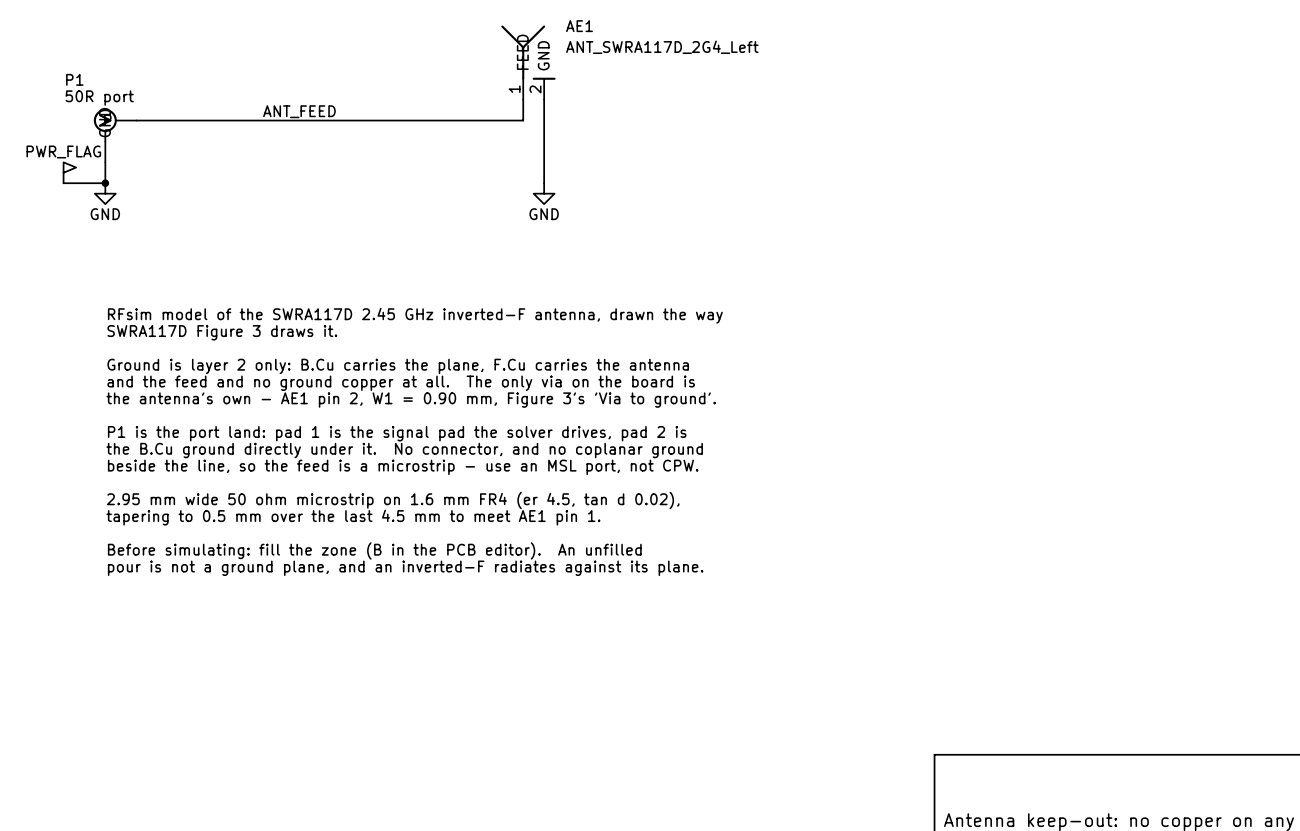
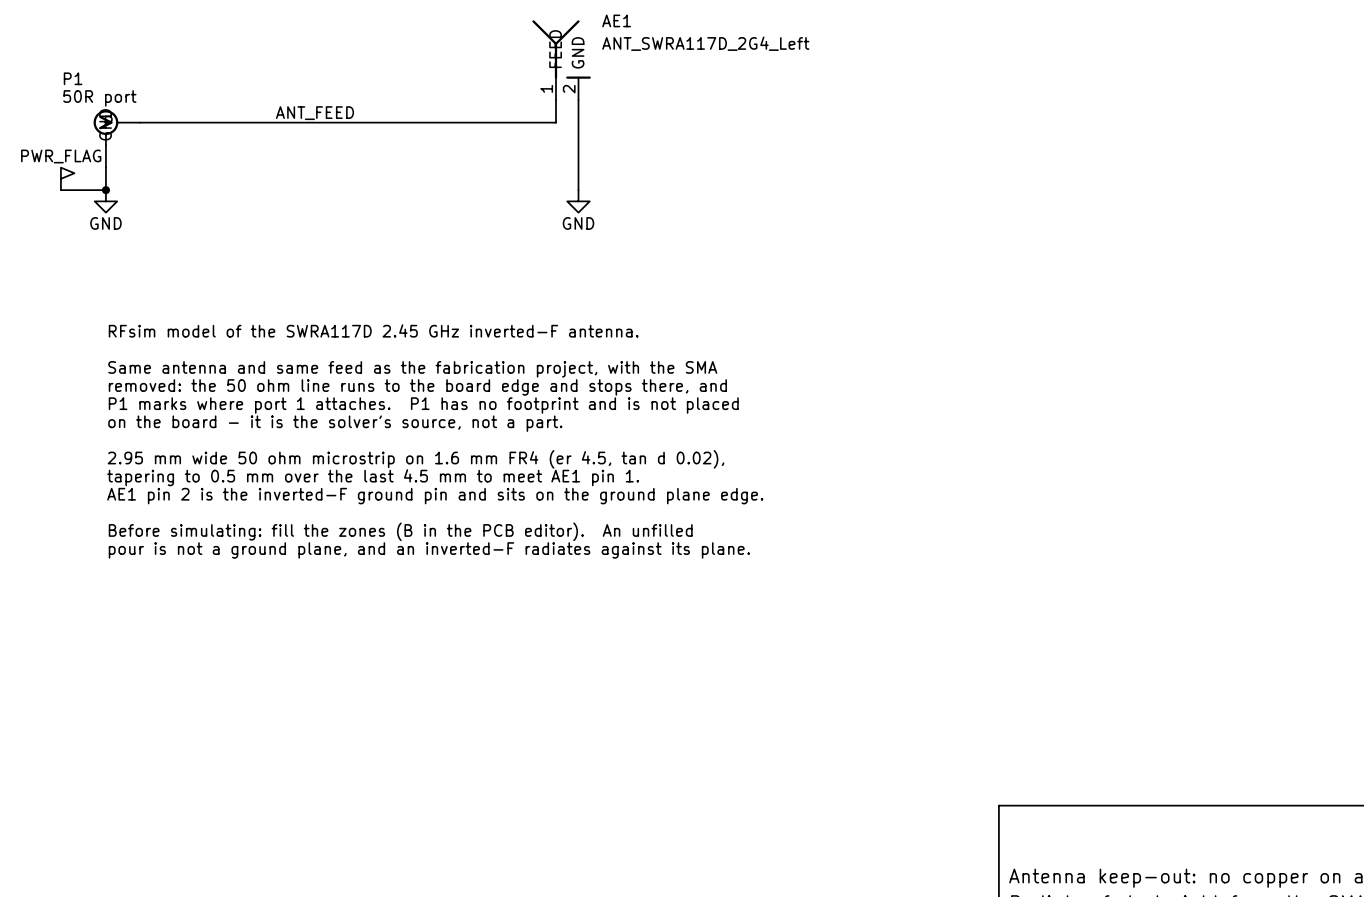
text: RFsim model of the SWRA117D 2.45 GHz inverted-F antenna, drawn the way (415, 315) -> RFsim model of the SWRA117D 2.45 GHz inverted-F antenna. (373, 330)
text: SWRA117D Figure 3 draws it. (222, 332) -> none
text: none -> Same antenna and same feed as the fabrication project, with the SMA (412, 369)
text: Ground is layer 2 only: B.Cu carries the plane, F.Cu carries the antenna (398, 366) -> removed: the 50 ohm line runs to the board edge and stops there, and (417, 387)
text: and the feed and no ground copper at all. The only via on the board is (401, 383) -> P1 marks where port 1 attaches. P1 has no footprint and is not placed (423, 405)
text: the antenna's own - AE1 pin 2, W1 = 0.90 mm, Figure 3's 'Via to ground'. (411, 400) -> on the board - it is the solver's source, not a part. (335, 423)
text: P1 is the port land: pad 1 is the signal pad the solver drives, pad 2 is (397, 433) -> 2.95 mm wide 50 ohm microstrip on 1.6 mm FR4 (er 4.5, tan d 0.02), (415, 459)
text: the B.Cu ground directly under it. No connector, and no coplanar ground (404, 450) -> tapering to 0.5 mm over the last 4.5 mm to meet AE1 pin 1. (373, 477)
text: beside the line, so the feed is a microstrip - use an MSL port, not CPW. (403, 467) -> AE1 pin 2 is the inverted-F ground pin and sits on the ground plane edge. (435, 496)
text: 2.95 mm wide 50 ohm microstrip on 1.6 mm FR4 (er 4.5, tan d 0.02), (393, 500) -> Before simulating: fill the zones (B in the PCB editor). An unfilled (400, 531)
text: tapering to 0.5 mm over the last 4.5 mm to meet AE1 pin 1. (353, 517) -> pour is not a ground plane, and an inverted-F radiates against its plane. (429, 550)
text: Before simulating: fill the zone (B in the PCB editor). An unfilled (374, 550) -> none
text: pour is not a ground plane, and an inverted-F radiates against its plane. (405, 568) -> none

